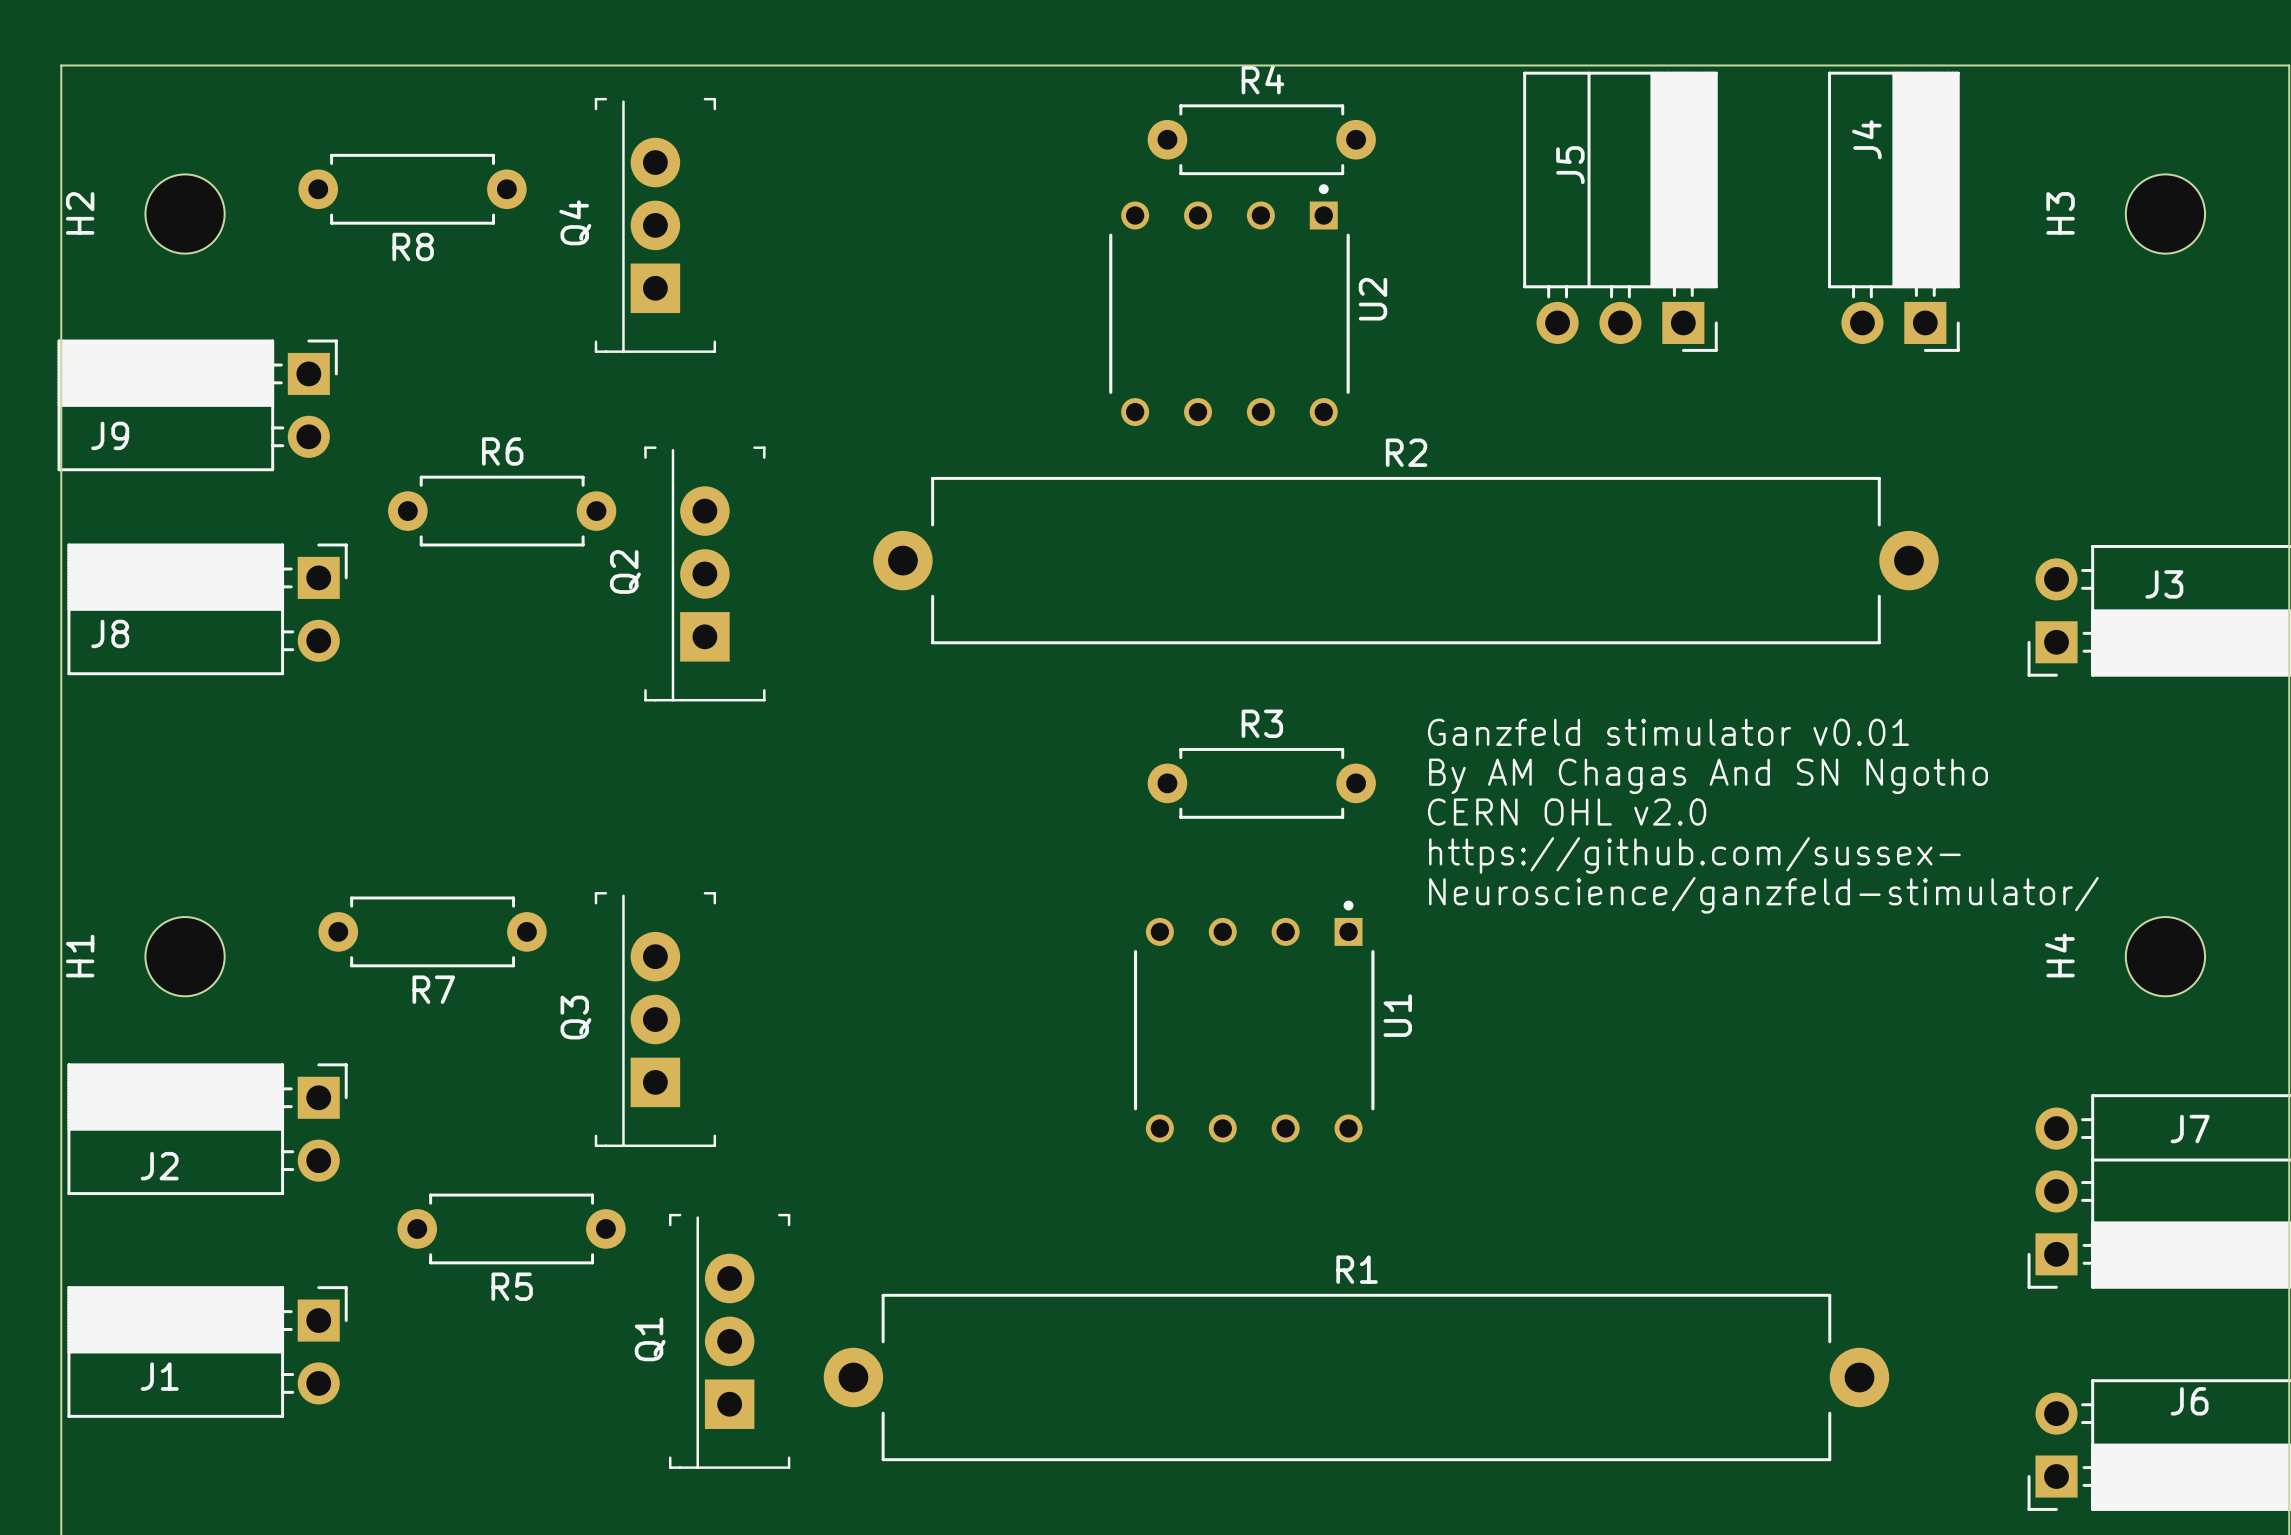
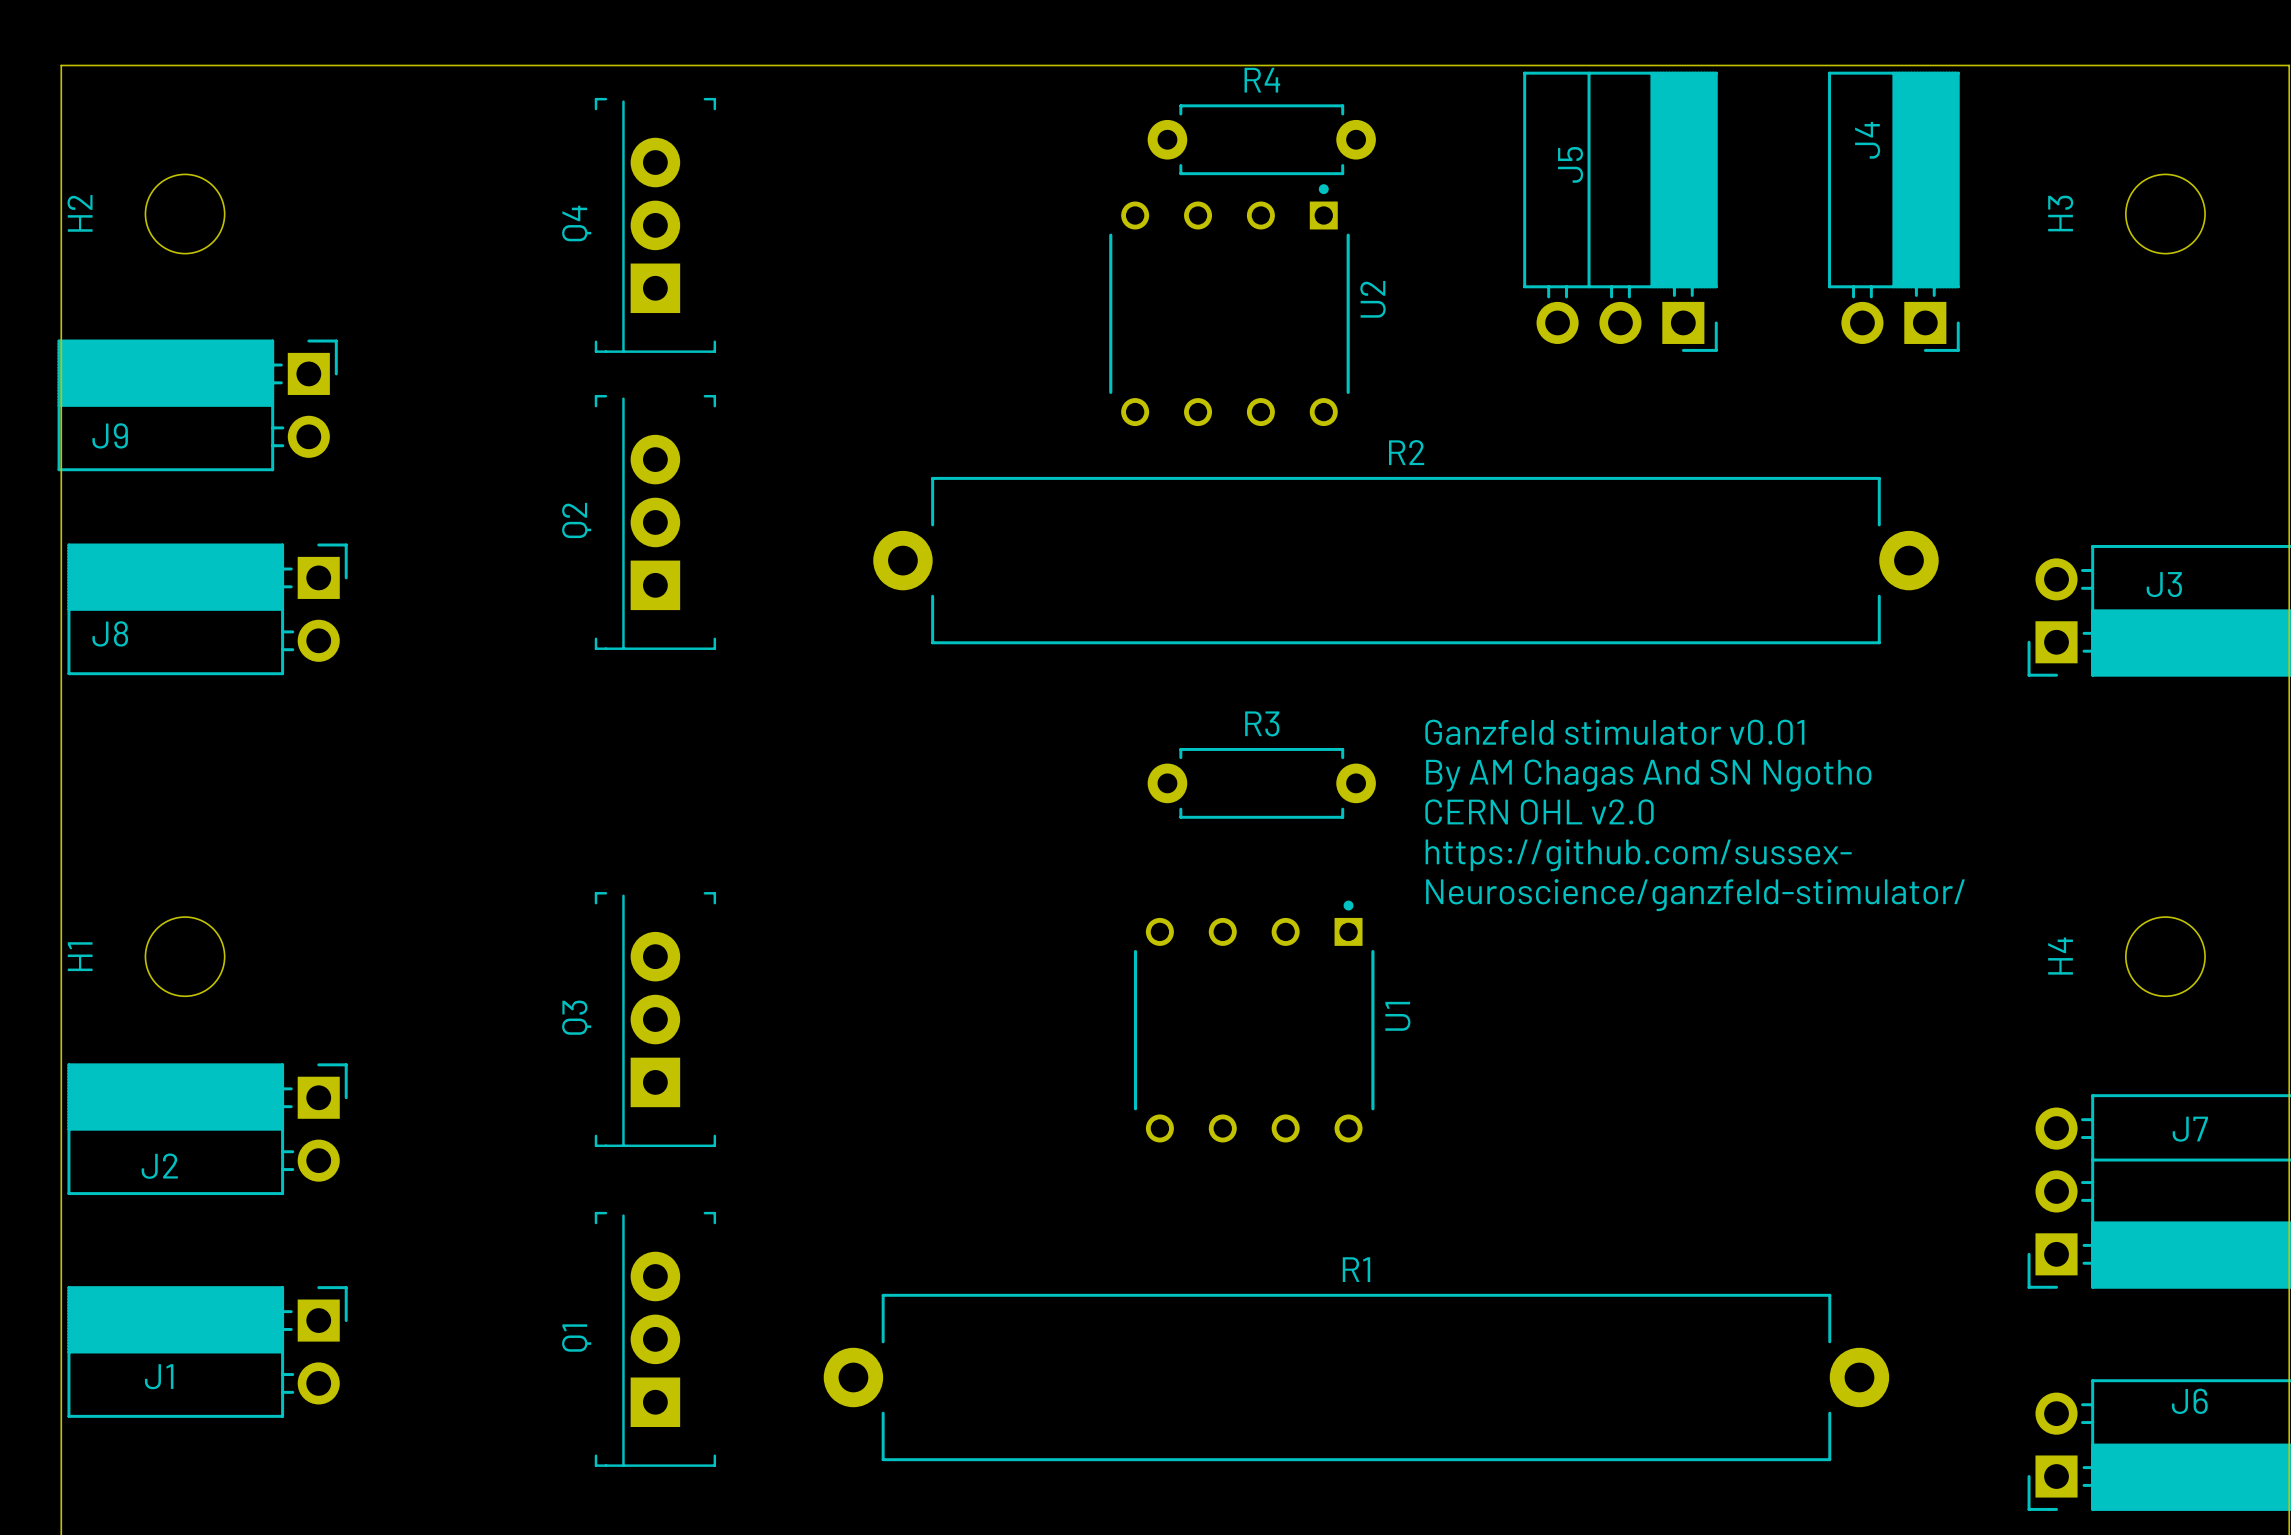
R8: (412, 189) -> none
R6: (502, 511) -> none
Q2 position: (704, 573) -> (655, 522)
R7: (432, 931) -> none
R5: (511, 1228) -> none
Q1 position: (729, 1341) -> (655, 1339)

